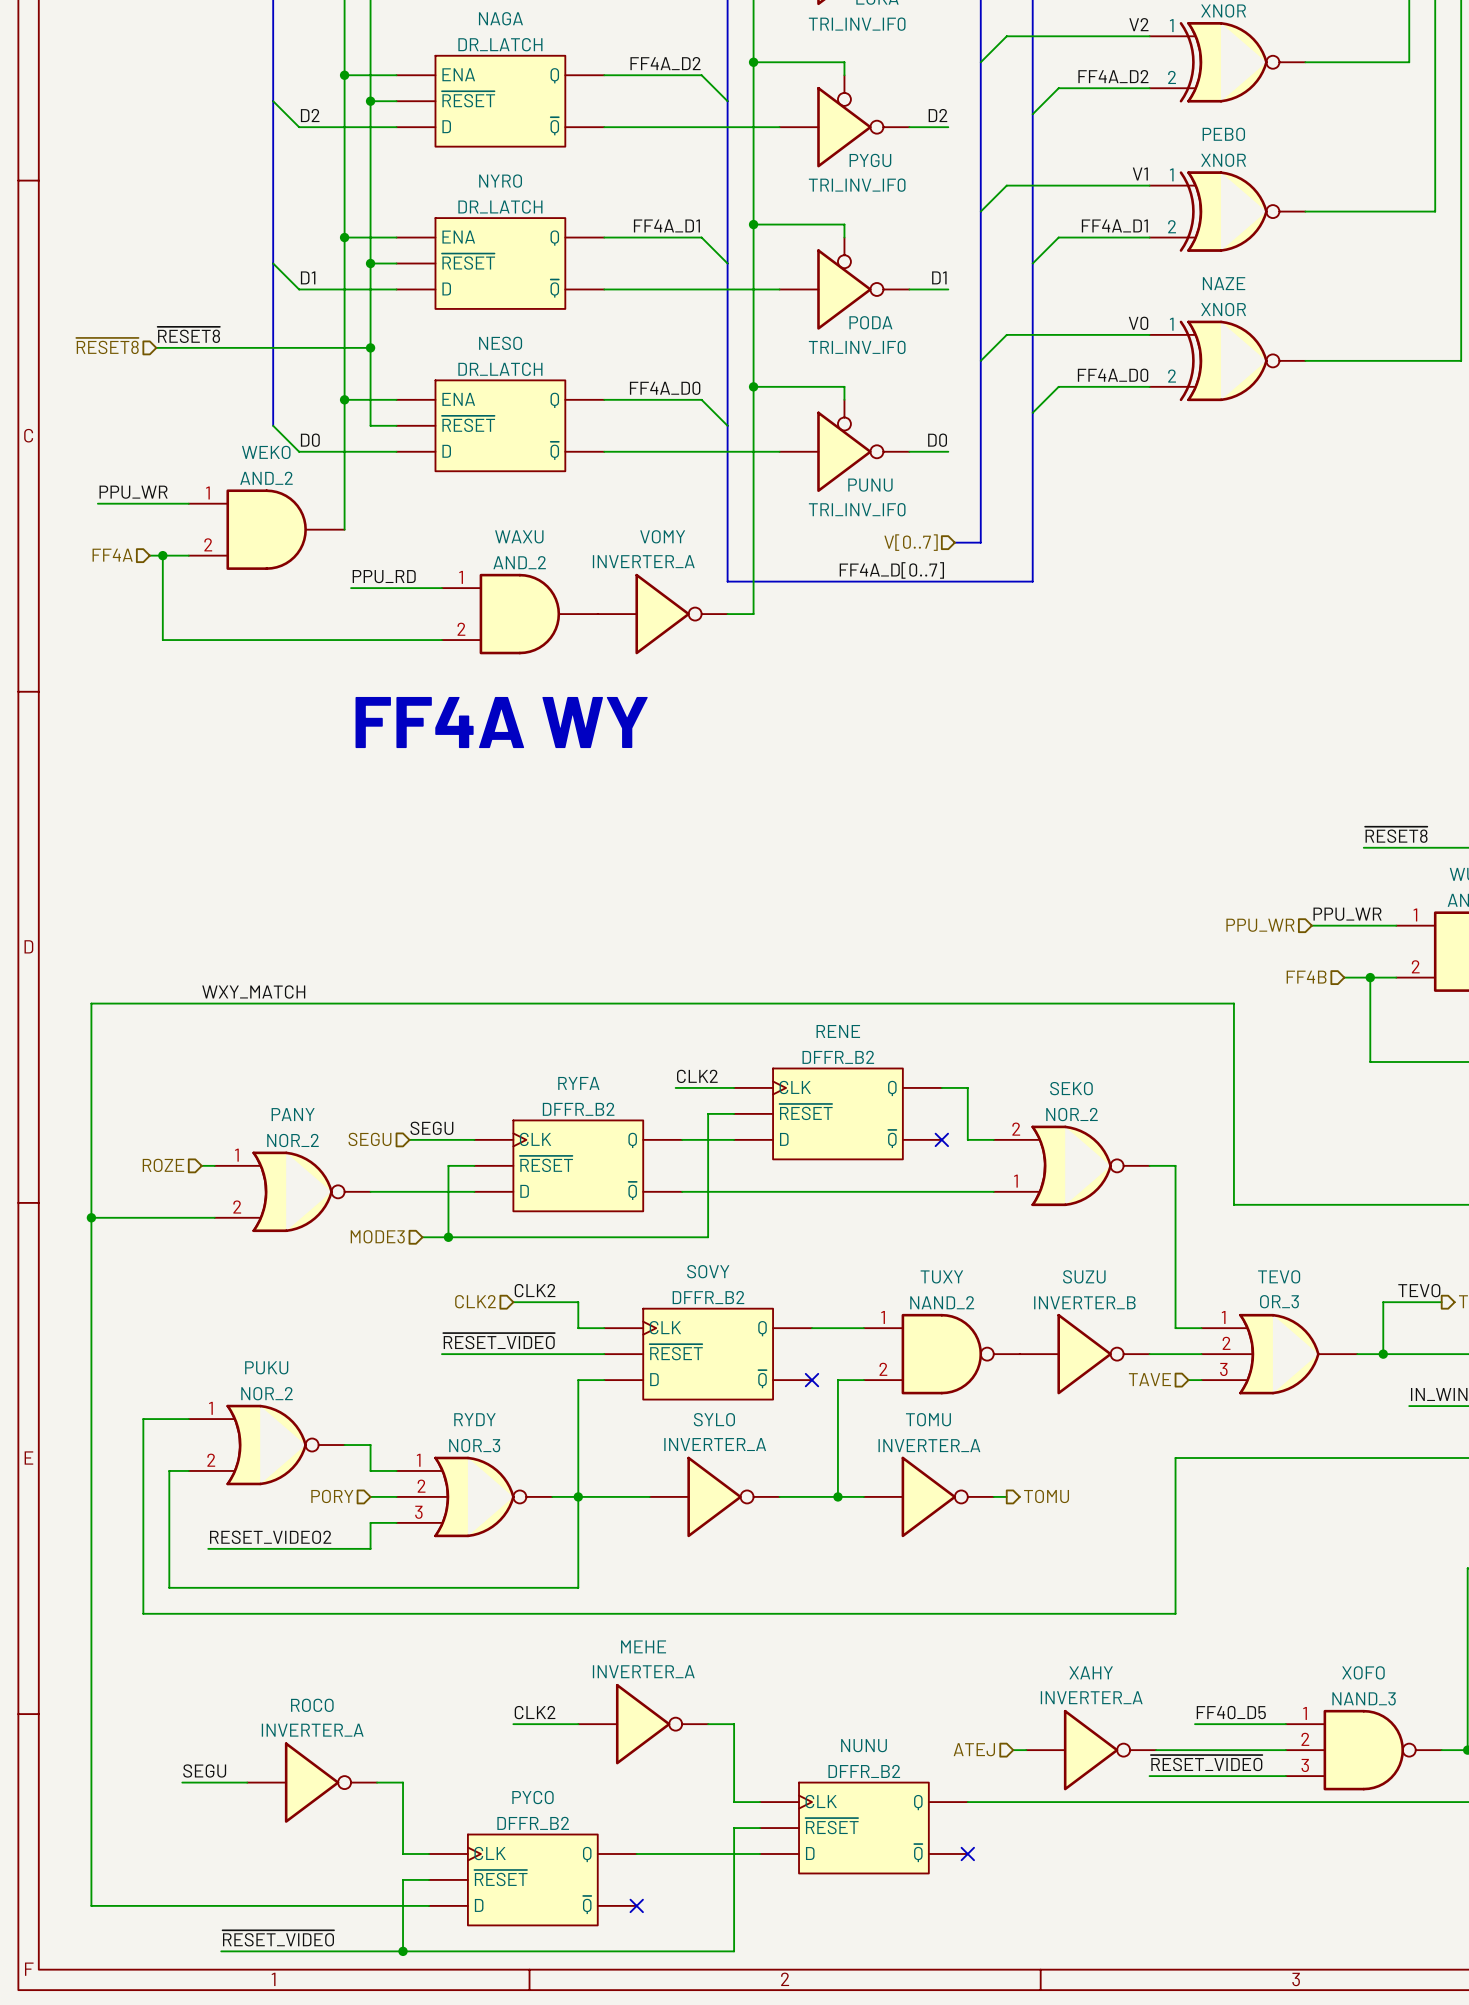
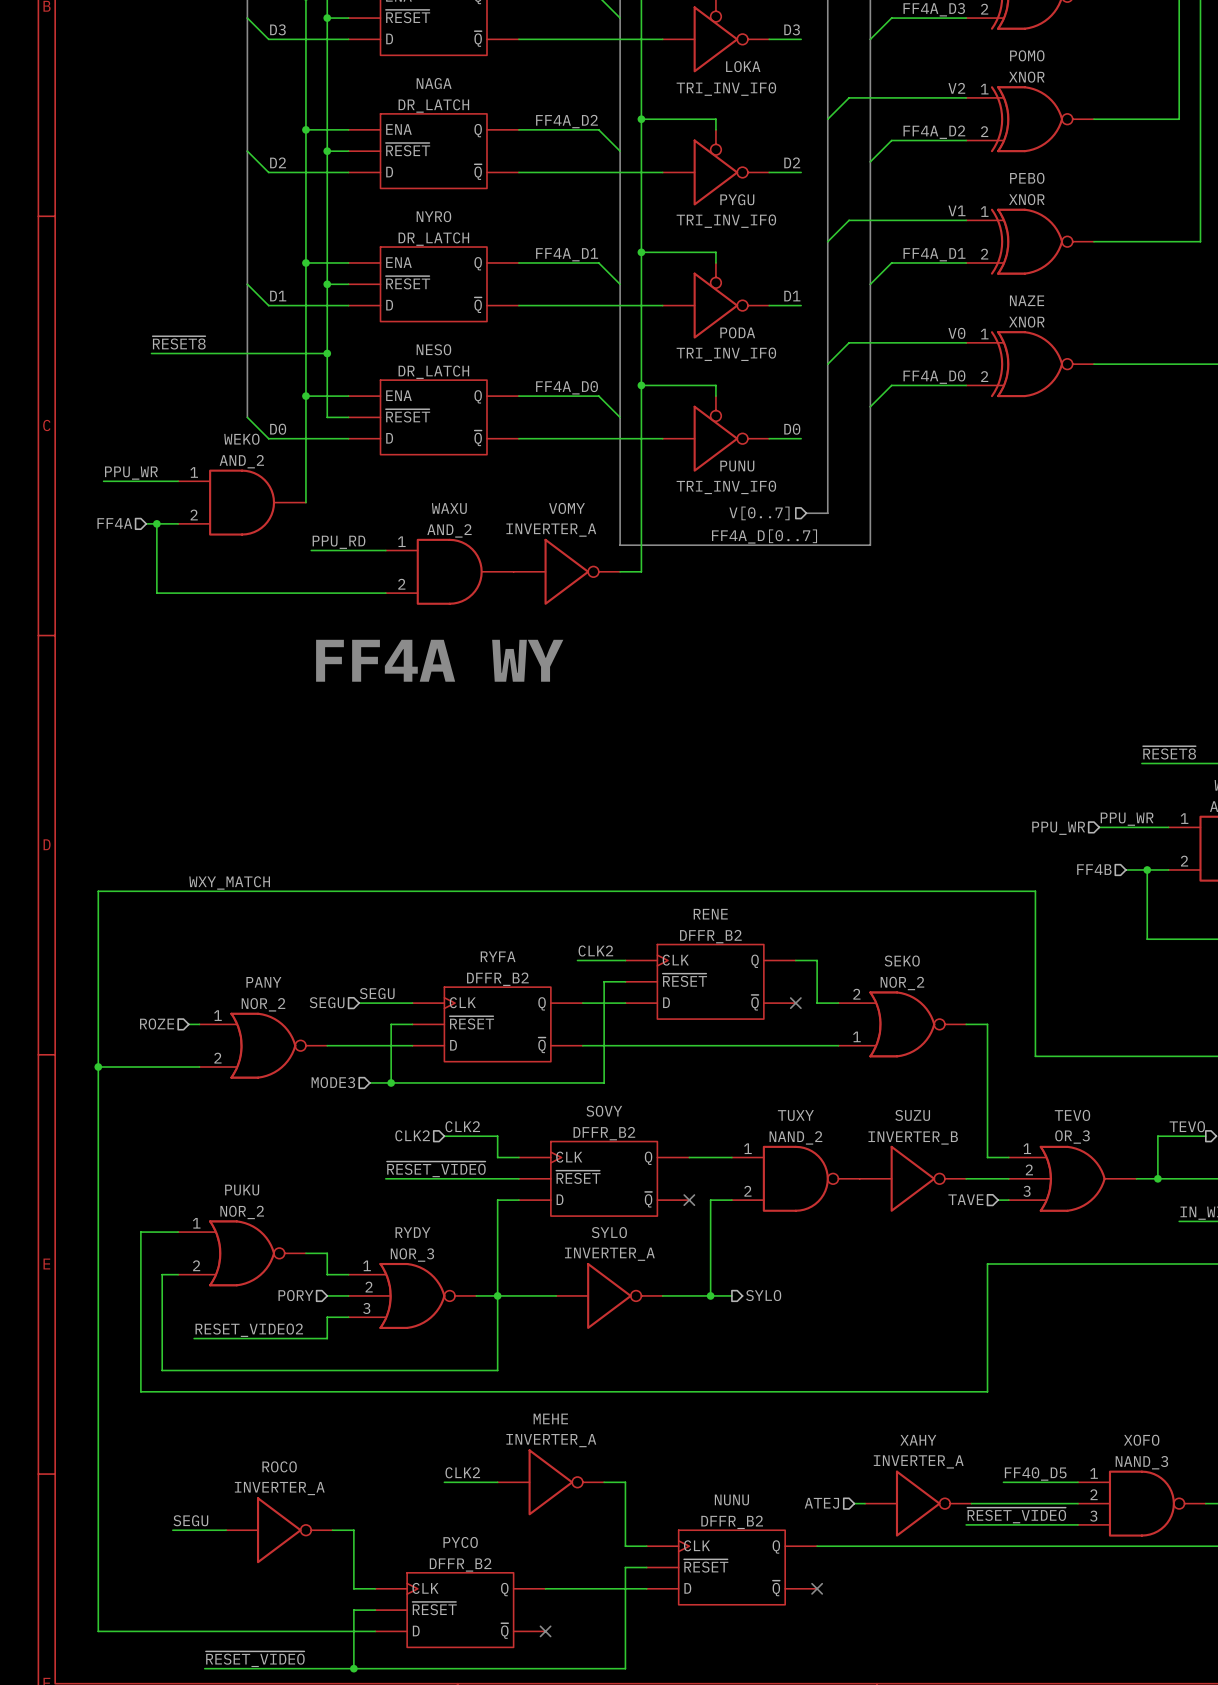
hierarchical label: ~{RESET8} (107, 346) -> none
hierarchical label: none -> SYLO (763, 1295)
TOMU: INVERTER_A (928, 1496) -> none
wire: (993, 1496) (1006, 1496) -> none
hierarchical label: TOMU (1046, 1496) -> none

